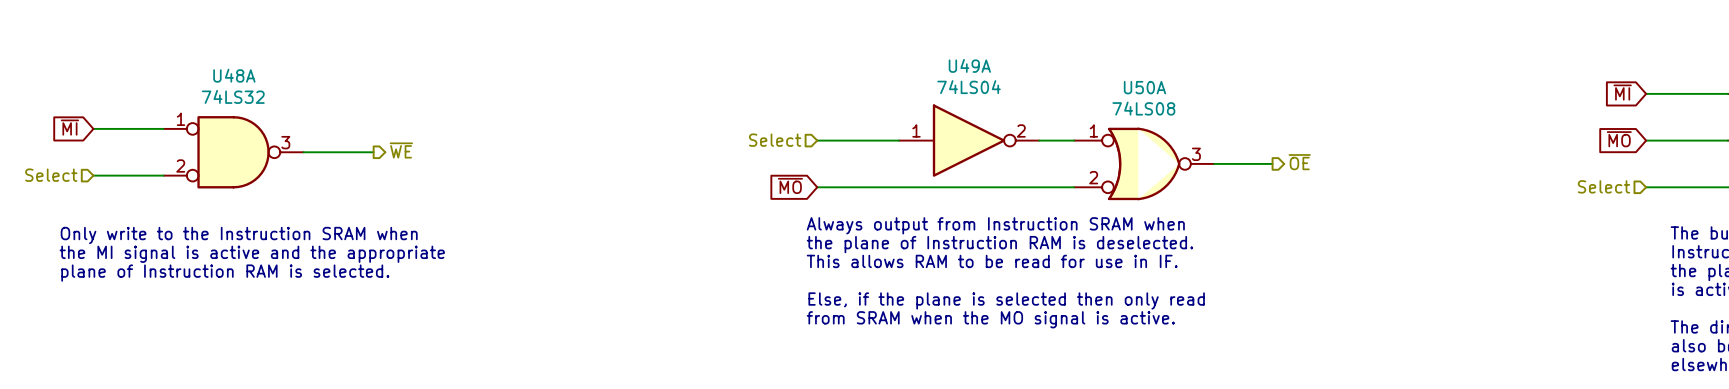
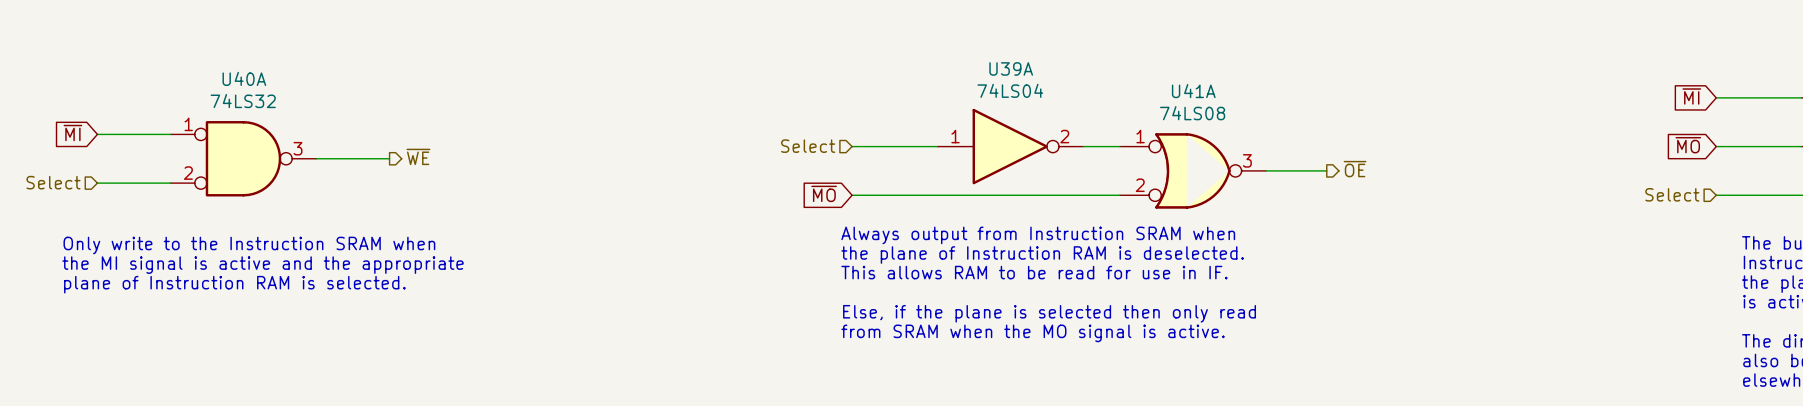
U49A name: U49A (969, 65) -> U39A (1011, 68)
U48A name: U48A (234, 75) -> U40A (244, 78)
U50A name: U50A (1144, 87) -> U41A (1193, 91)

